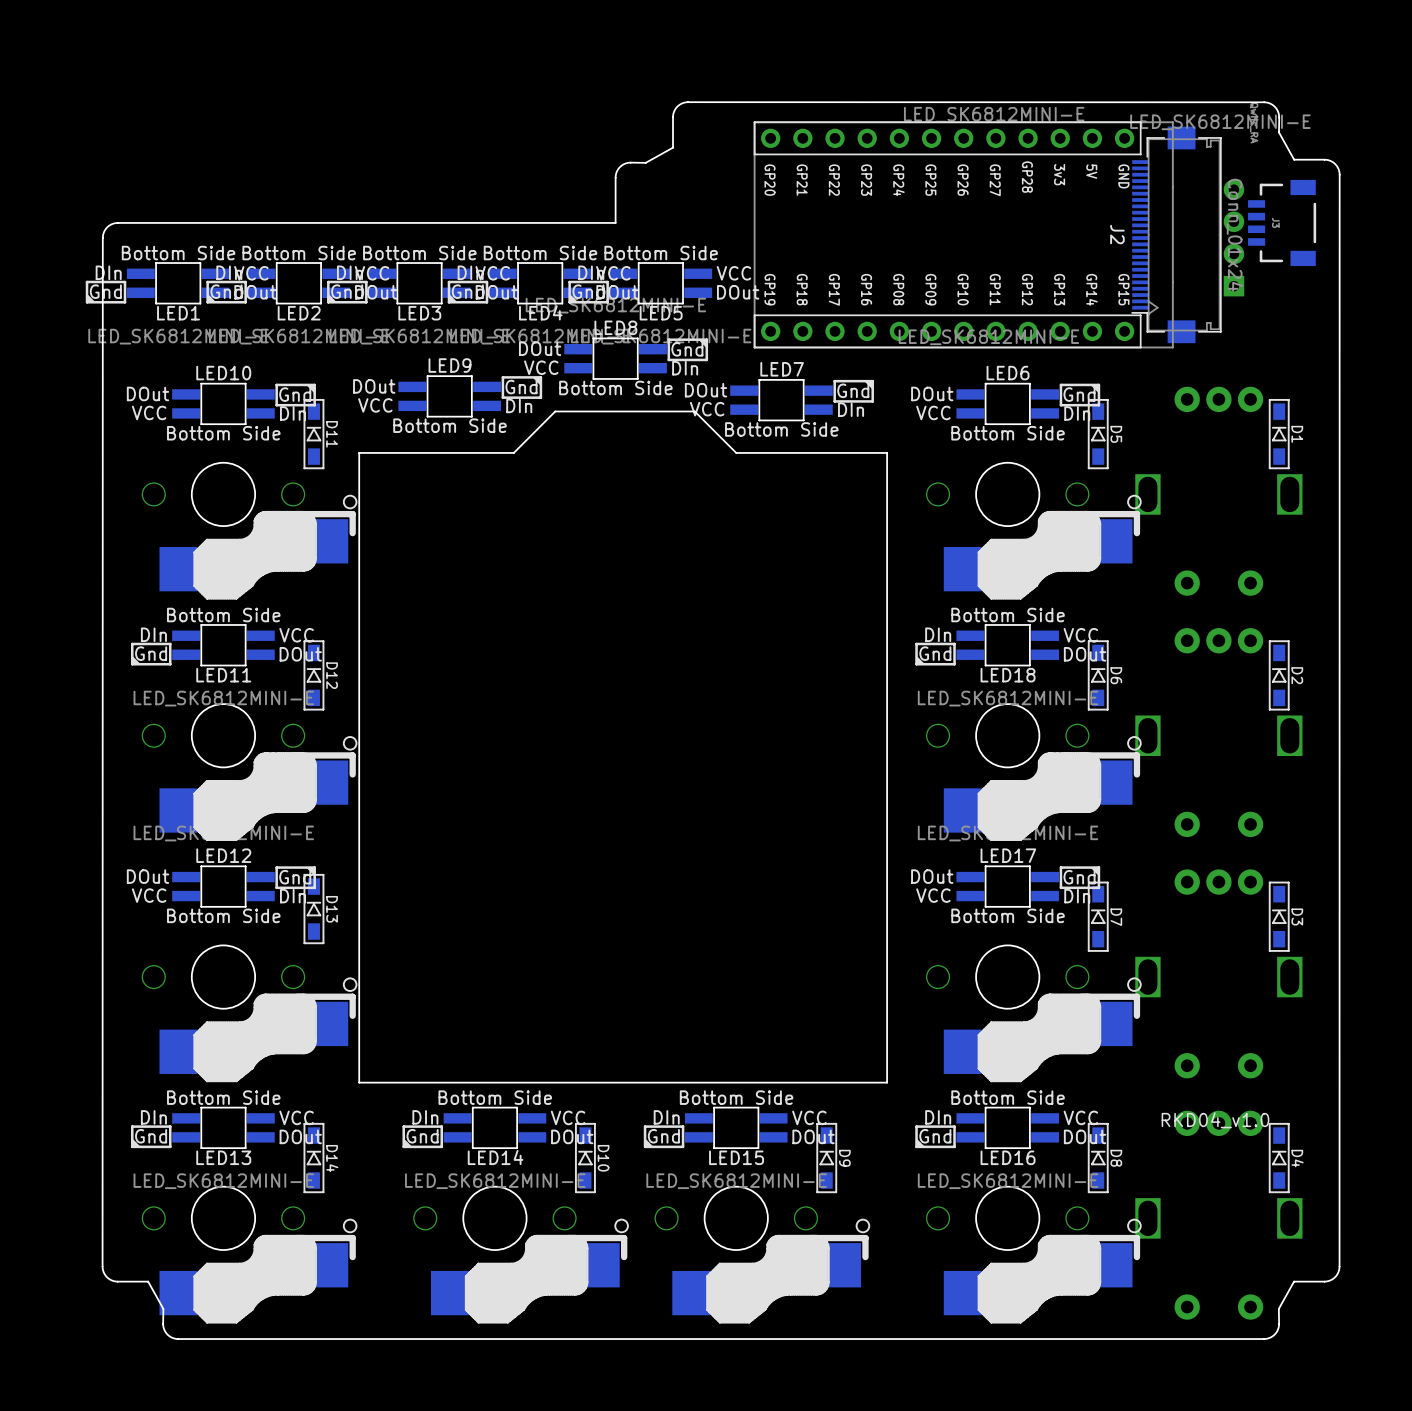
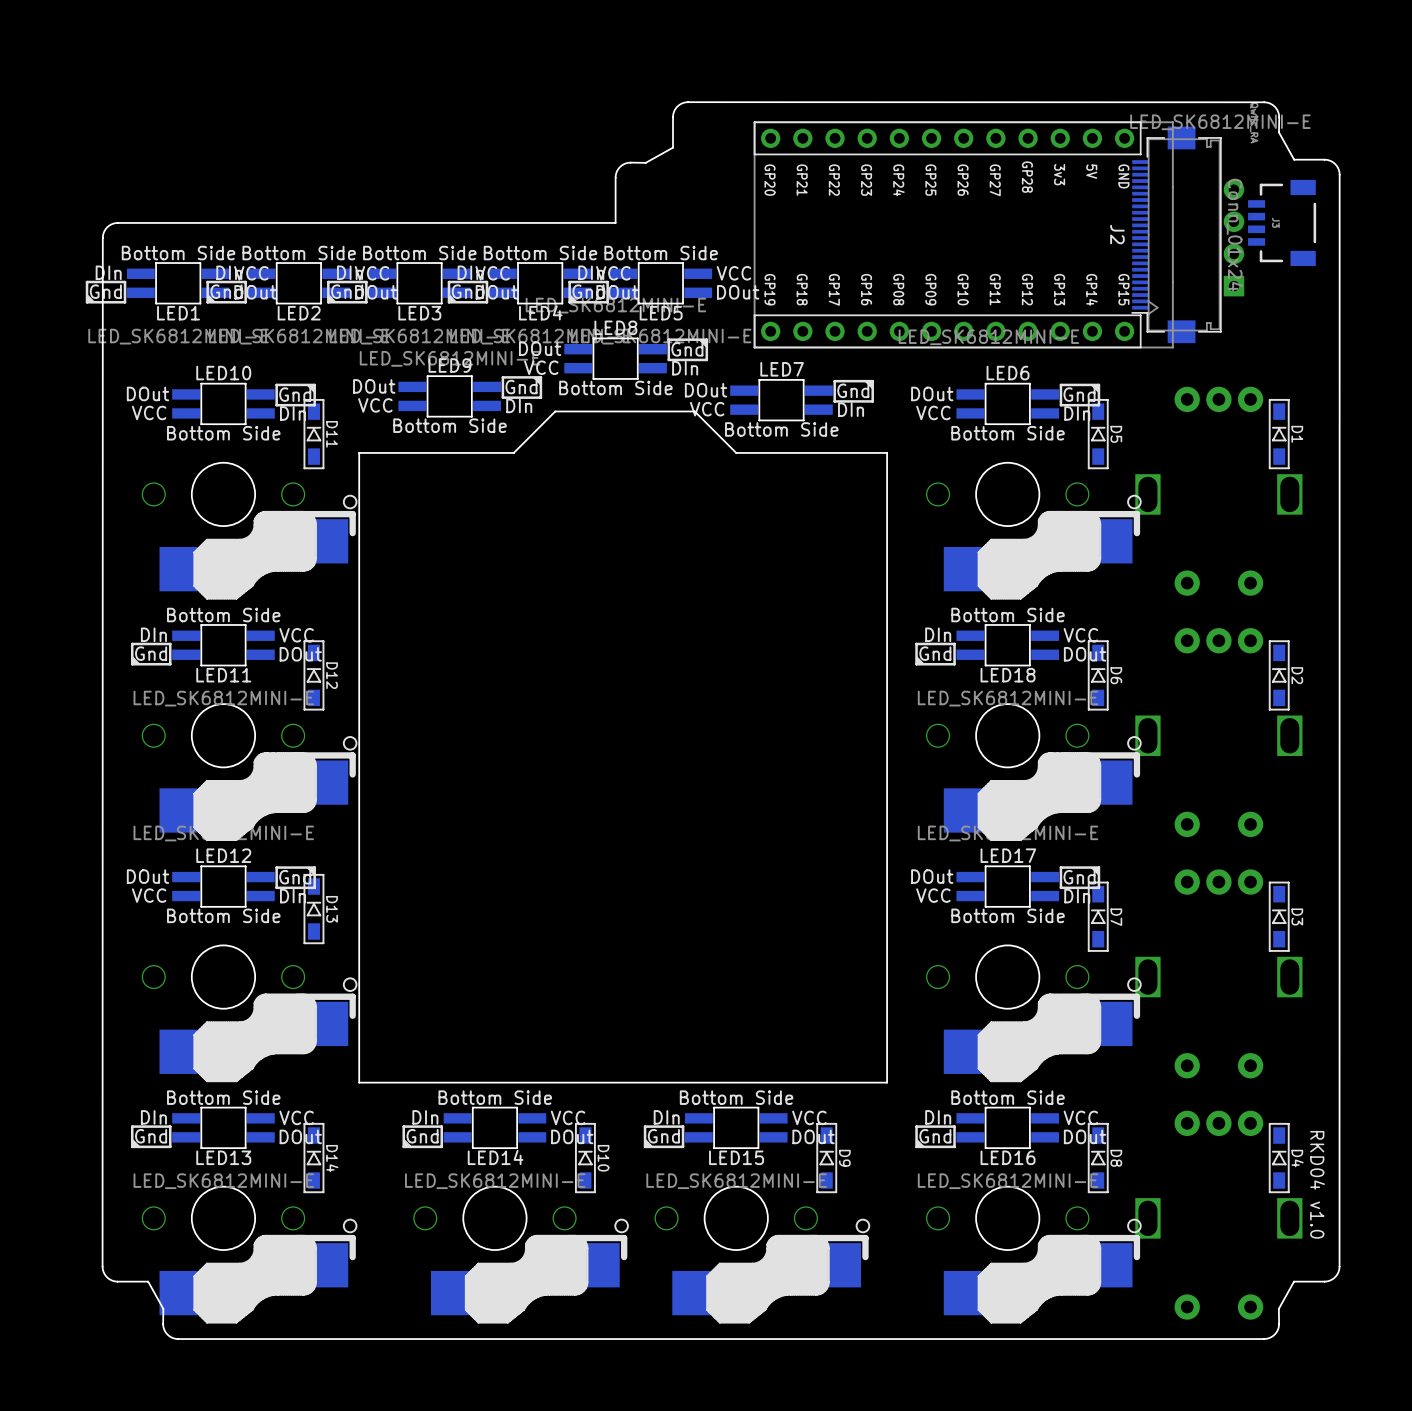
LED9 value position: LED_SK6812MINI-E (994, 114) -> LED_SK6812MINI-E (450, 358)
text: RKD04_v1.0 (1215, 1120) -> none
text: none -> RKD04 v1.0 (1317, 1184)

